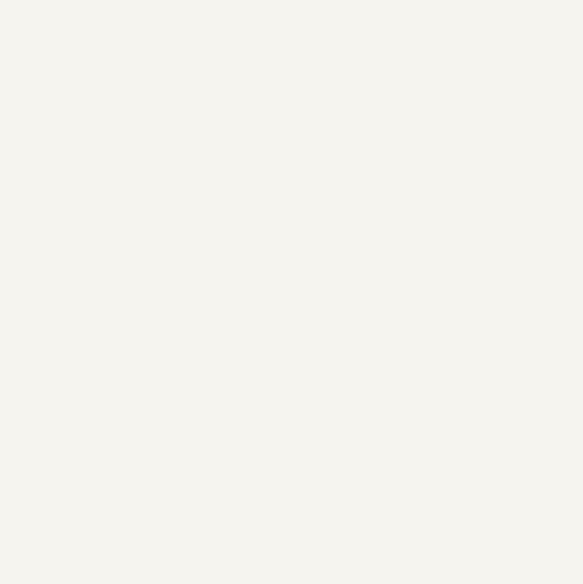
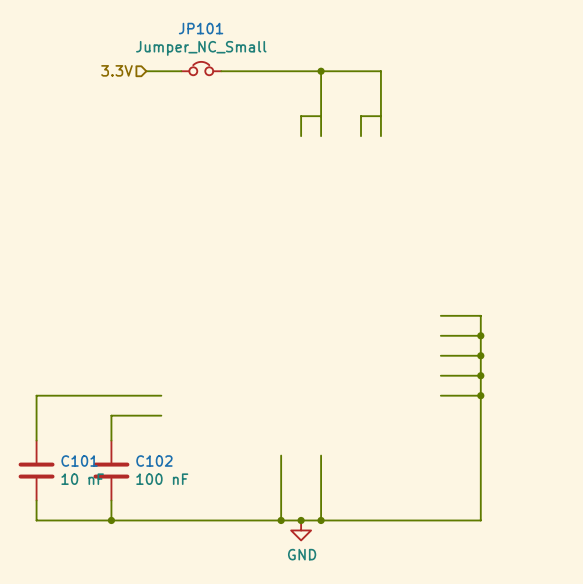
JP101: none -> Jumper_NC_Small (201, 68)
hierarchical label: none -> 3.3V (116, 70)
wire: none -> (146, 71) (181, 71)
wire: none -> (221, 71) (380, 71) (380, 136)
wire: none -> (321, 71) (321, 136)
junction: none -> (321, 71)
wire: none -> (321, 116) (301, 116) (301, 136)
wire: none -> (380, 116) (361, 116) (361, 136)
wire: none -> (440, 315) (480, 315) (480, 520) (36, 520) (36, 500)
wire: none -> (440, 335) (480, 335)
junction: none -> (480, 335)
wire: none -> (440, 355) (480, 355)
junction: none -> (480, 355)
wire: none -> (440, 375) (480, 375)
junction: none -> (480, 375)
wire: none -> (161, 395) (36, 395) (36, 440)
wire: none -> (440, 395) (480, 395)
junction: none -> (480, 395)
wire: none -> (161, 415) (111, 415) (111, 440)
wire: none -> (281, 455) (281, 520)
wire: none -> (321, 455) (321, 520)
C101: none -> 10 nF (36, 470)
C102: none -> 100 nF (111, 470)
wire: none -> (111, 500) (111, 520)
junction: none -> (111, 520)
junction: none -> (281, 520)
junction: none -> (301, 520)
junction: none -> (321, 520)
power symbol: none -> GND (301, 530)

